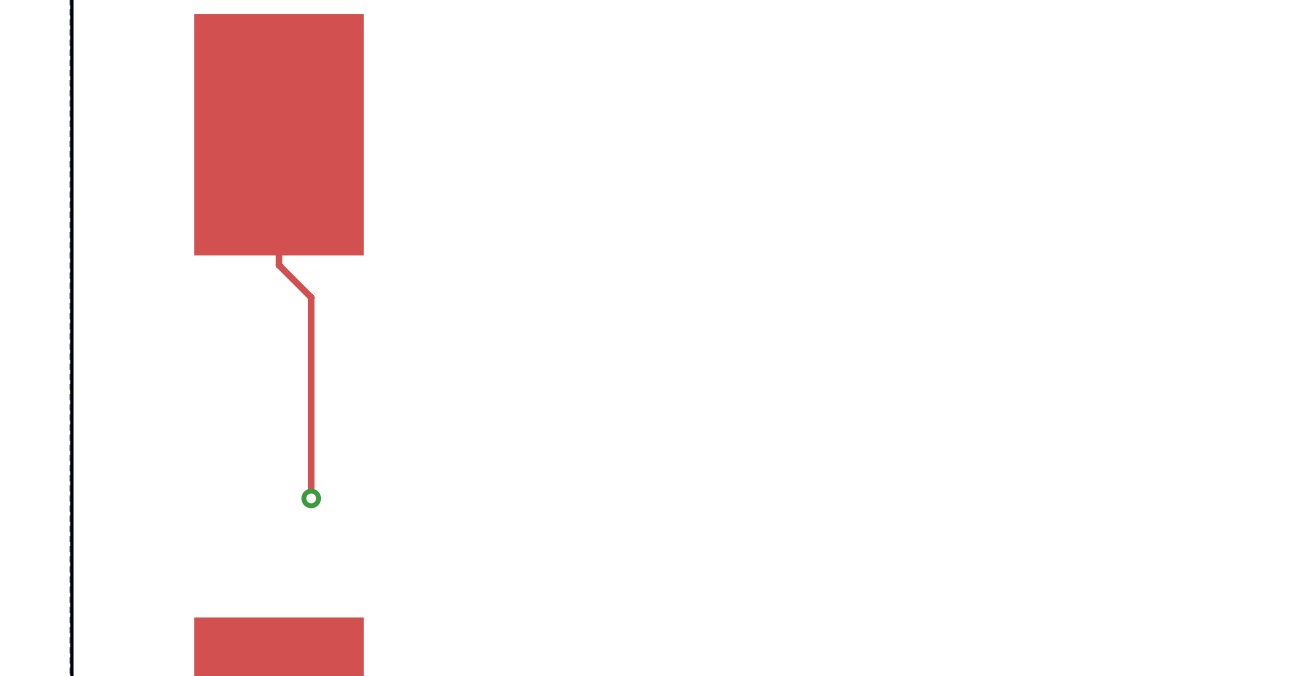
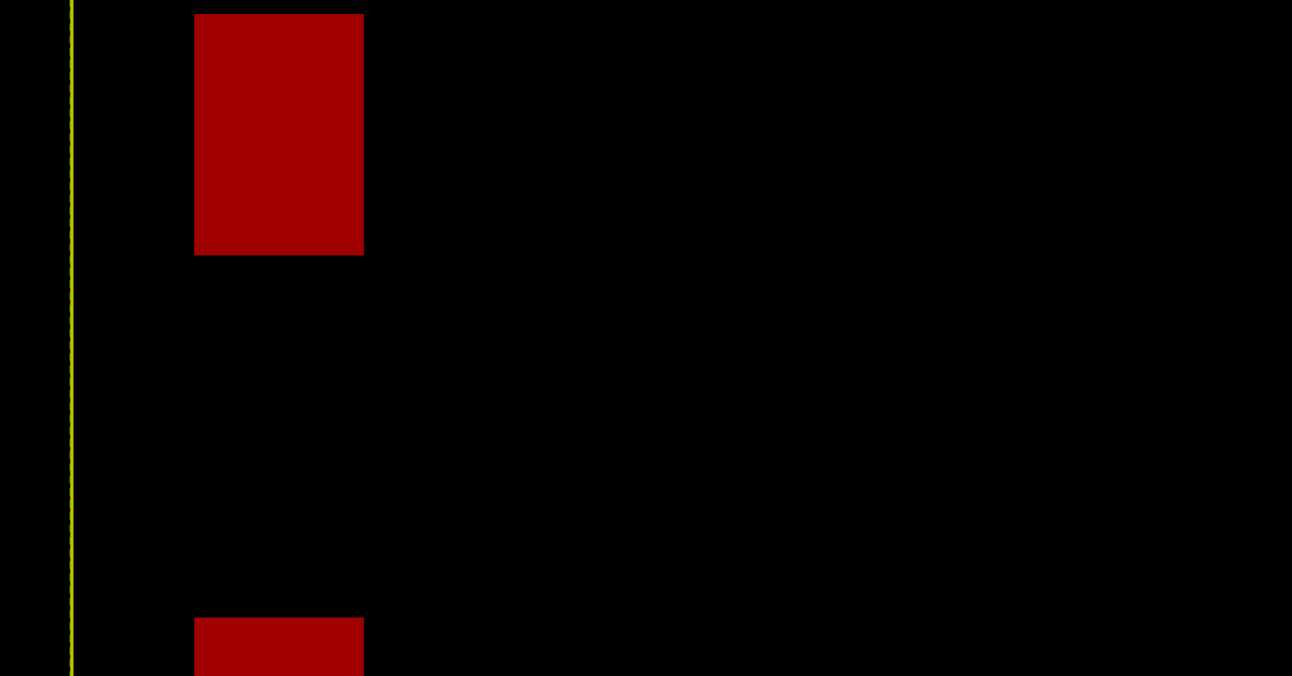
top track: (279, 134) (279, 265) (311, 297) (311, 498) -> none
via: (311, 498) -> none

